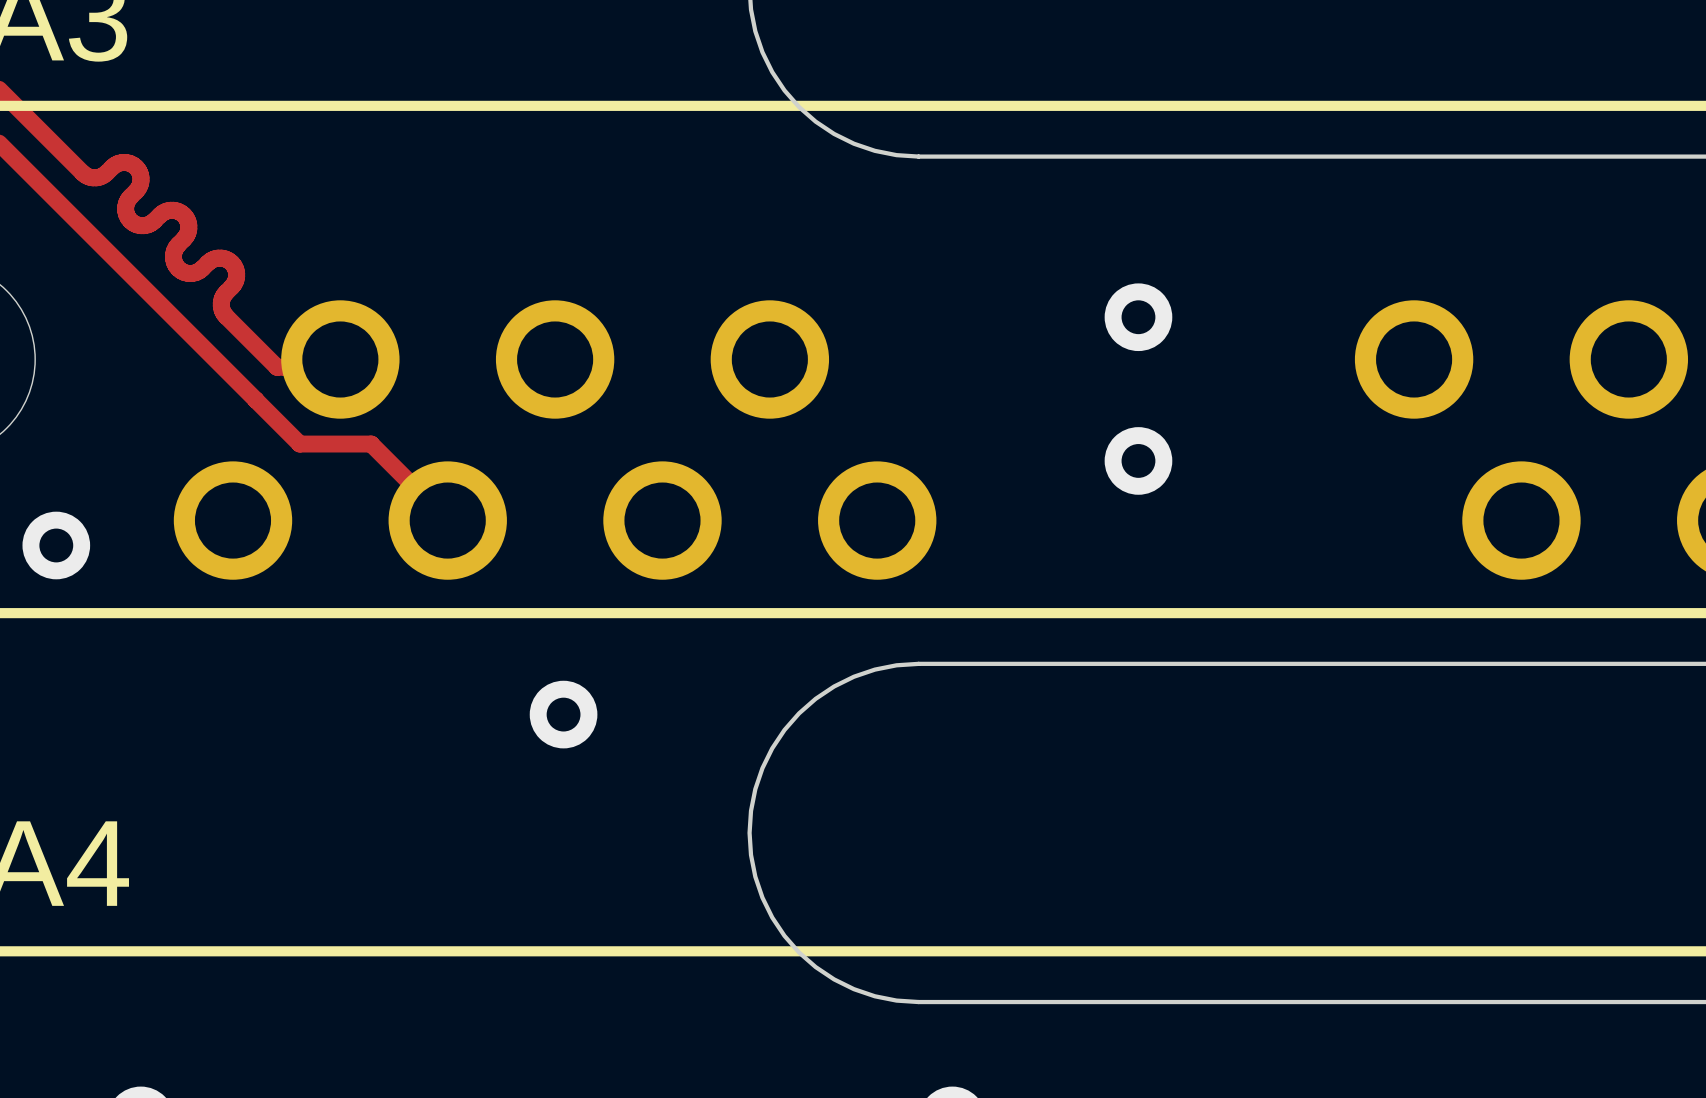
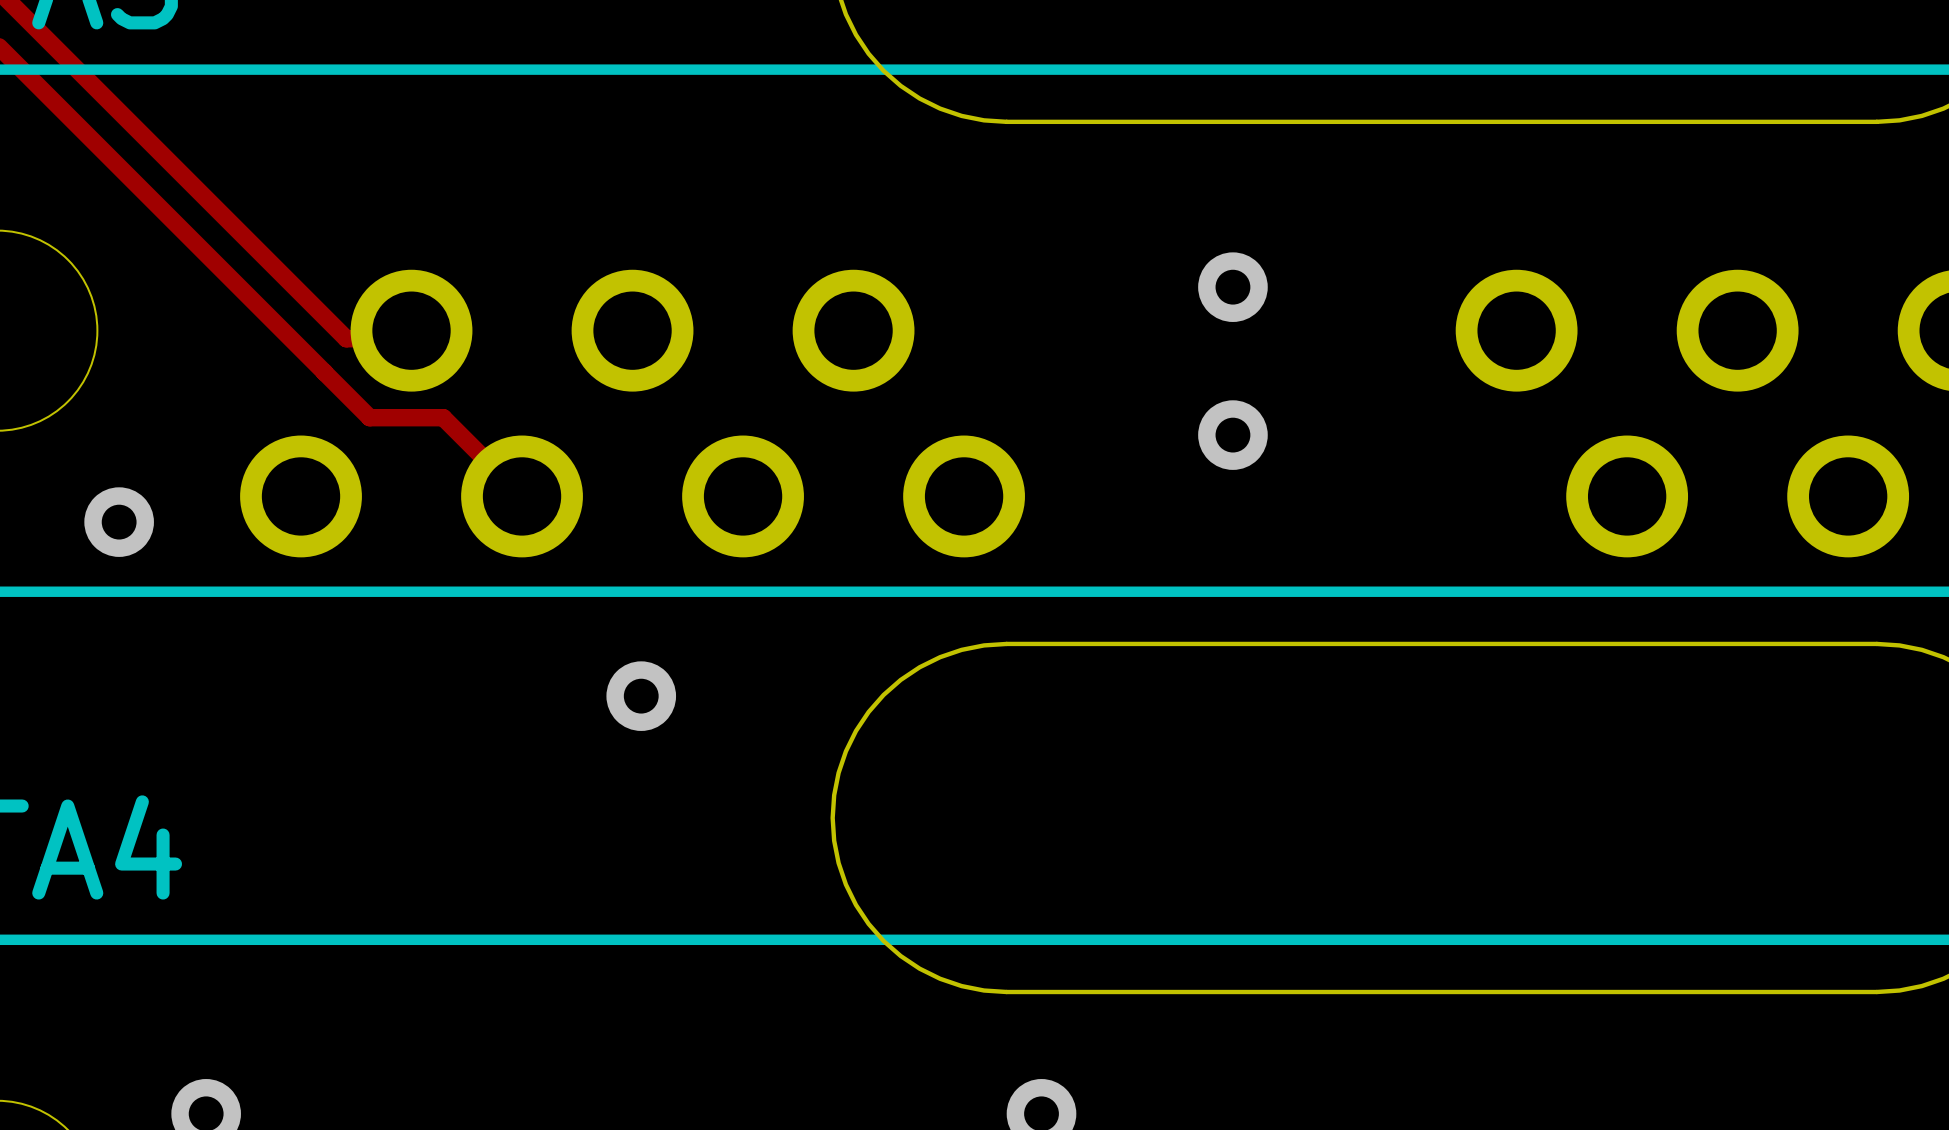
track: (82, 172) (89, 176) (100, 176) (115, 164) (122, 162) (129, 163) (136, 167) (140, 173) (140, 181) (138, 188) (126, 203) (125, 210) (128, 217) (136, 224) (144, 225) (151, 223) (166, 211) (173, 210) (183, 215) (187, 221) (187, 232) (175, 247) (173, 258) (175, 265) (184, 272) (195, 272) (210, 260) (217, 258) (225, 258) (231, 262) (235, 269) (235, 280) (223, 295) (221, 302) (222, 310) (226, 316) -> (146, 138) (293, 286)

